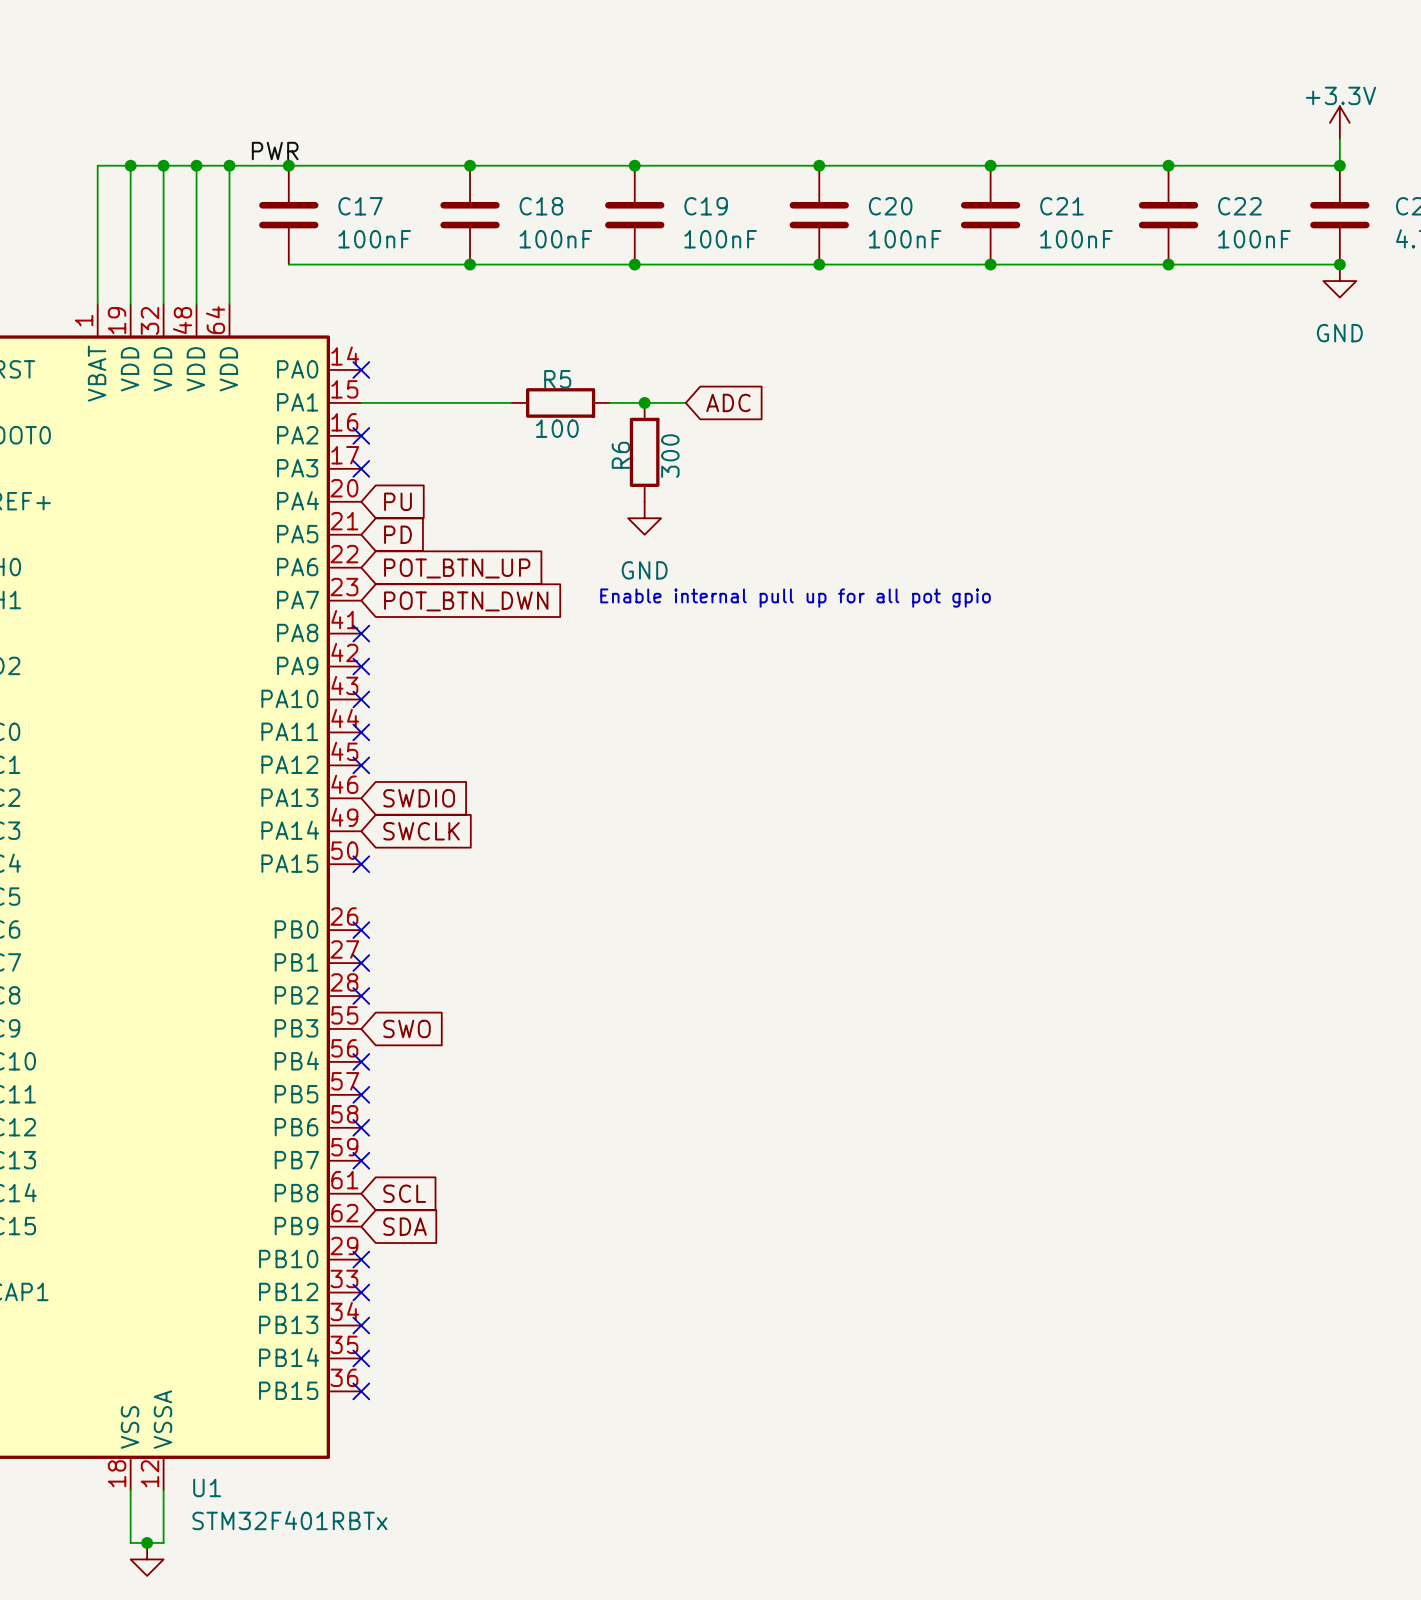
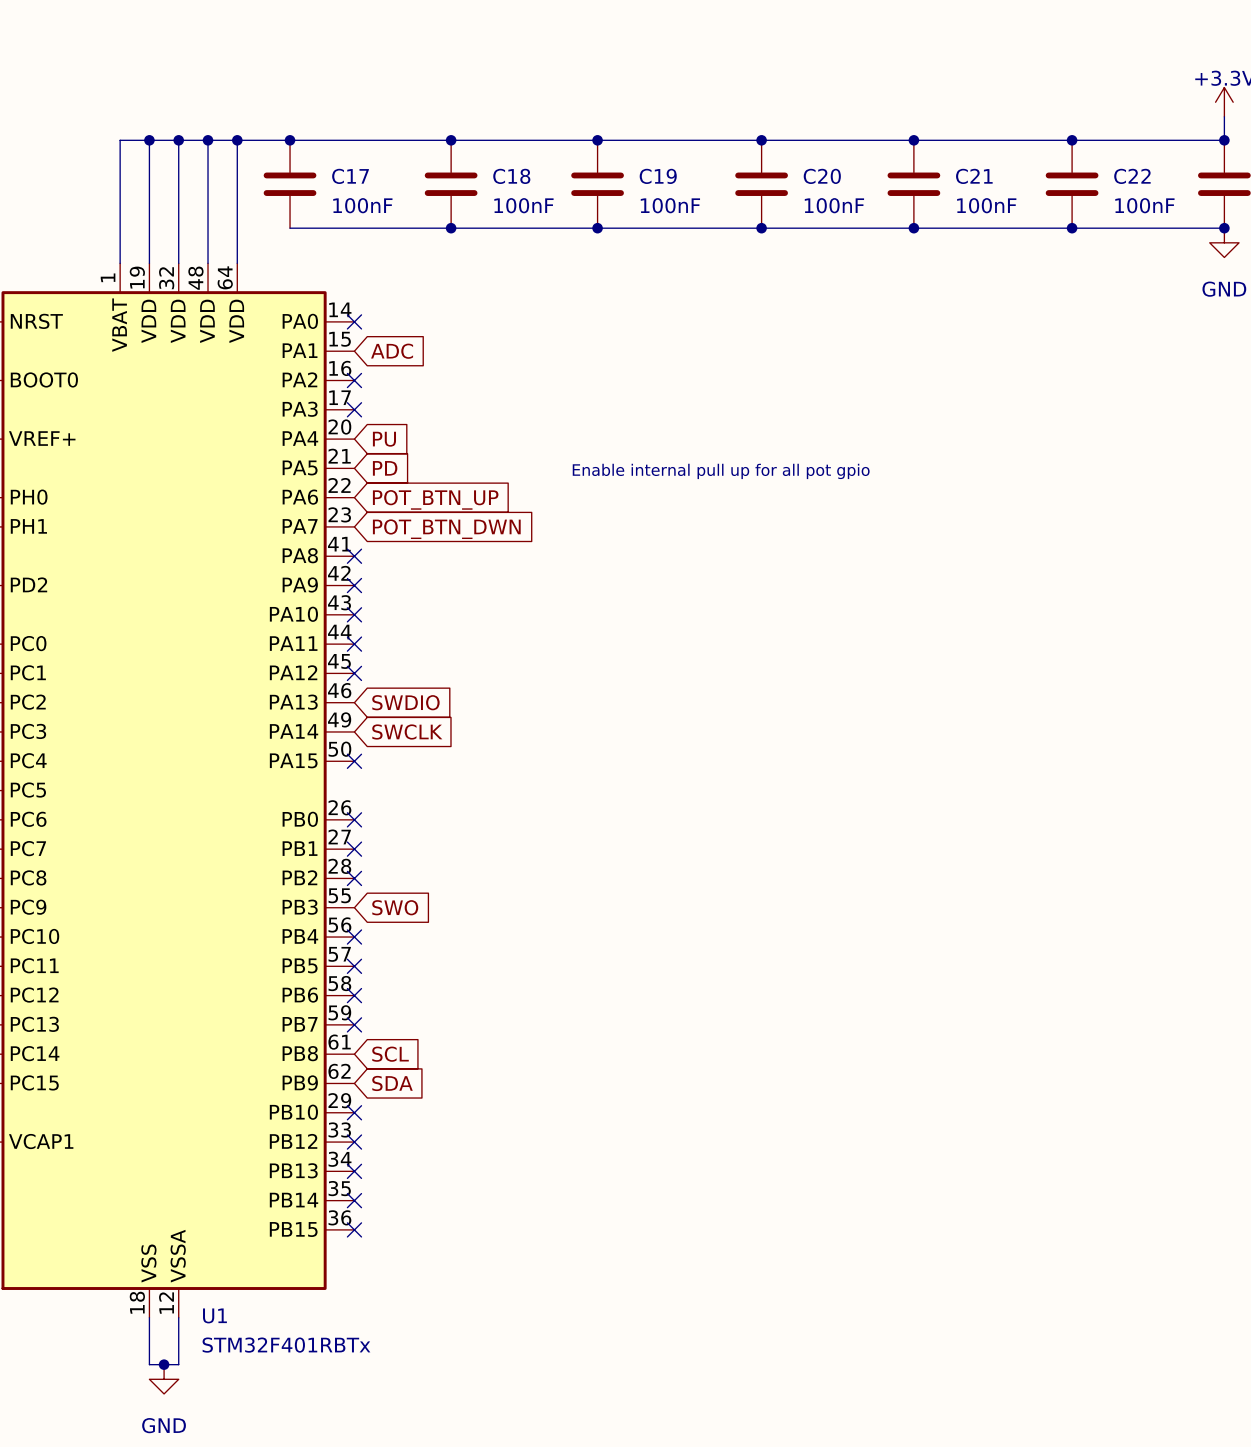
label: PWR (275, 151) -> none
wire: (361, 402) (511, 402) -> none
global label: none -> ADC (392, 351)
R5: 100 (560, 402) -> none
wire: (610, 402) (685, 402) -> none
junction: (644, 402) -> none
global label: ADC (728, 402) -> none
R6: 300 (644, 452) -> none
power symbol: GND (644, 518) -> none
text position: Enable internal pull up for all pot gpio (795, 598) -> Enable internal pull up for all pot gpio (721, 471)

